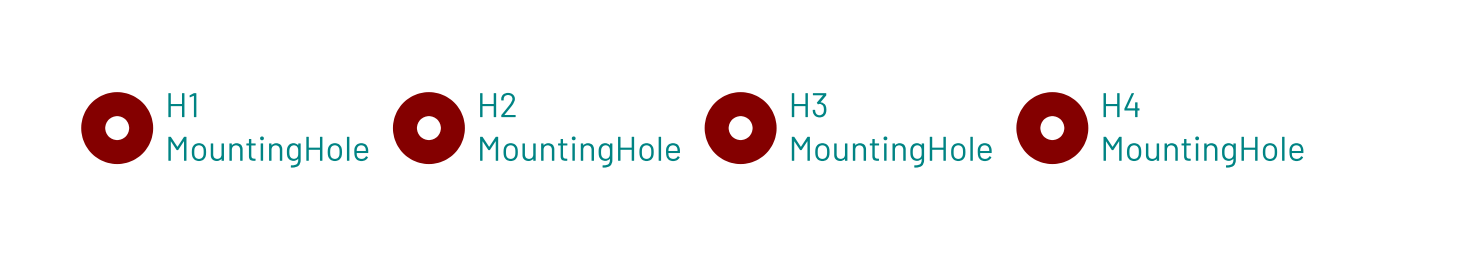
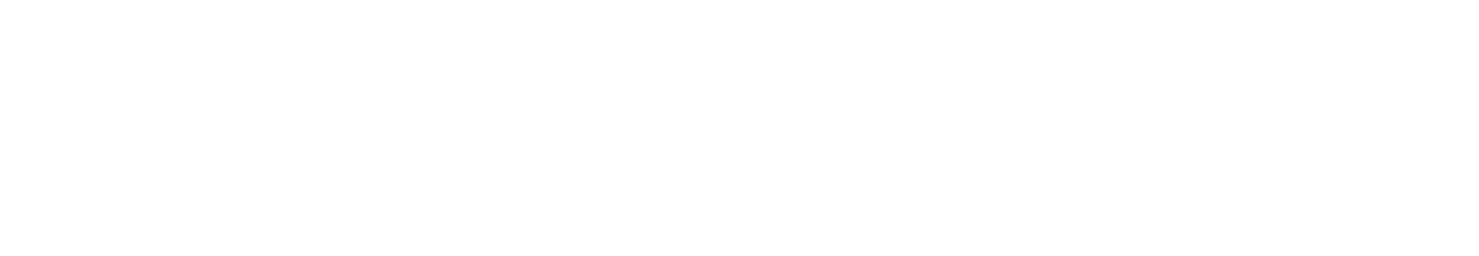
H1: MountingHole (117, 128) -> none
H2: MountingHole (428, 128) -> none
H3: MountingHole (740, 128) -> none
H4: MountingHole (1052, 128) -> none

